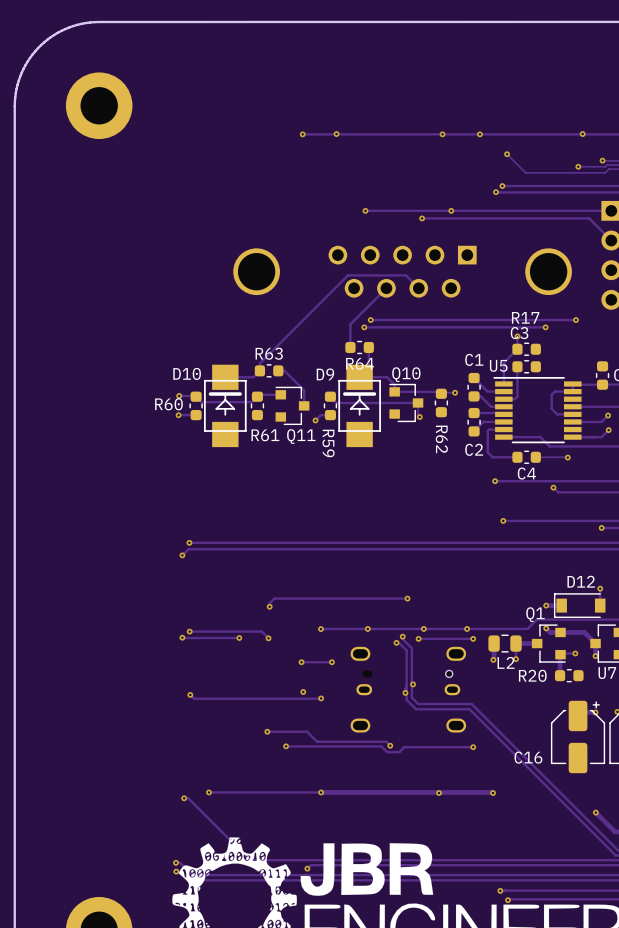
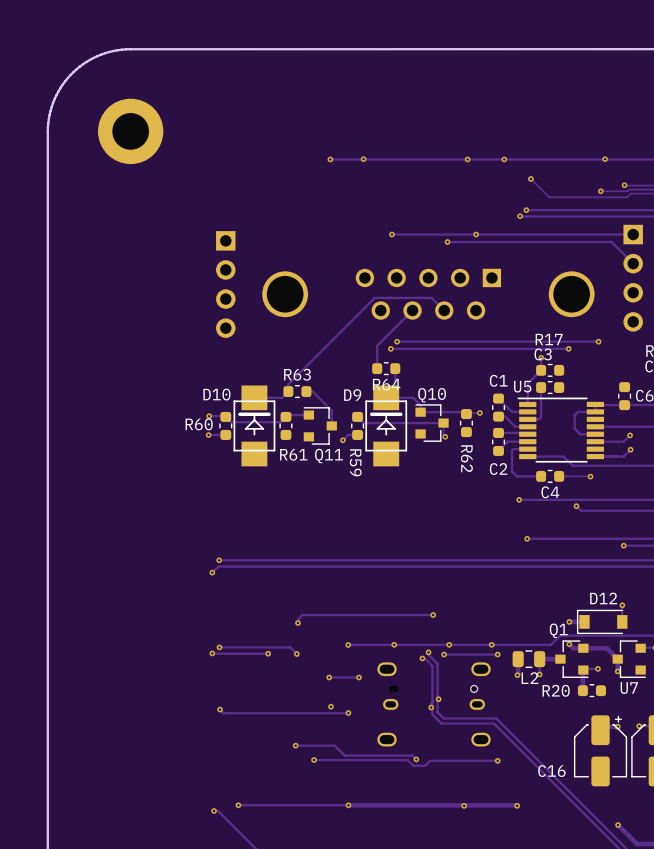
part: none -> (225, 284)

